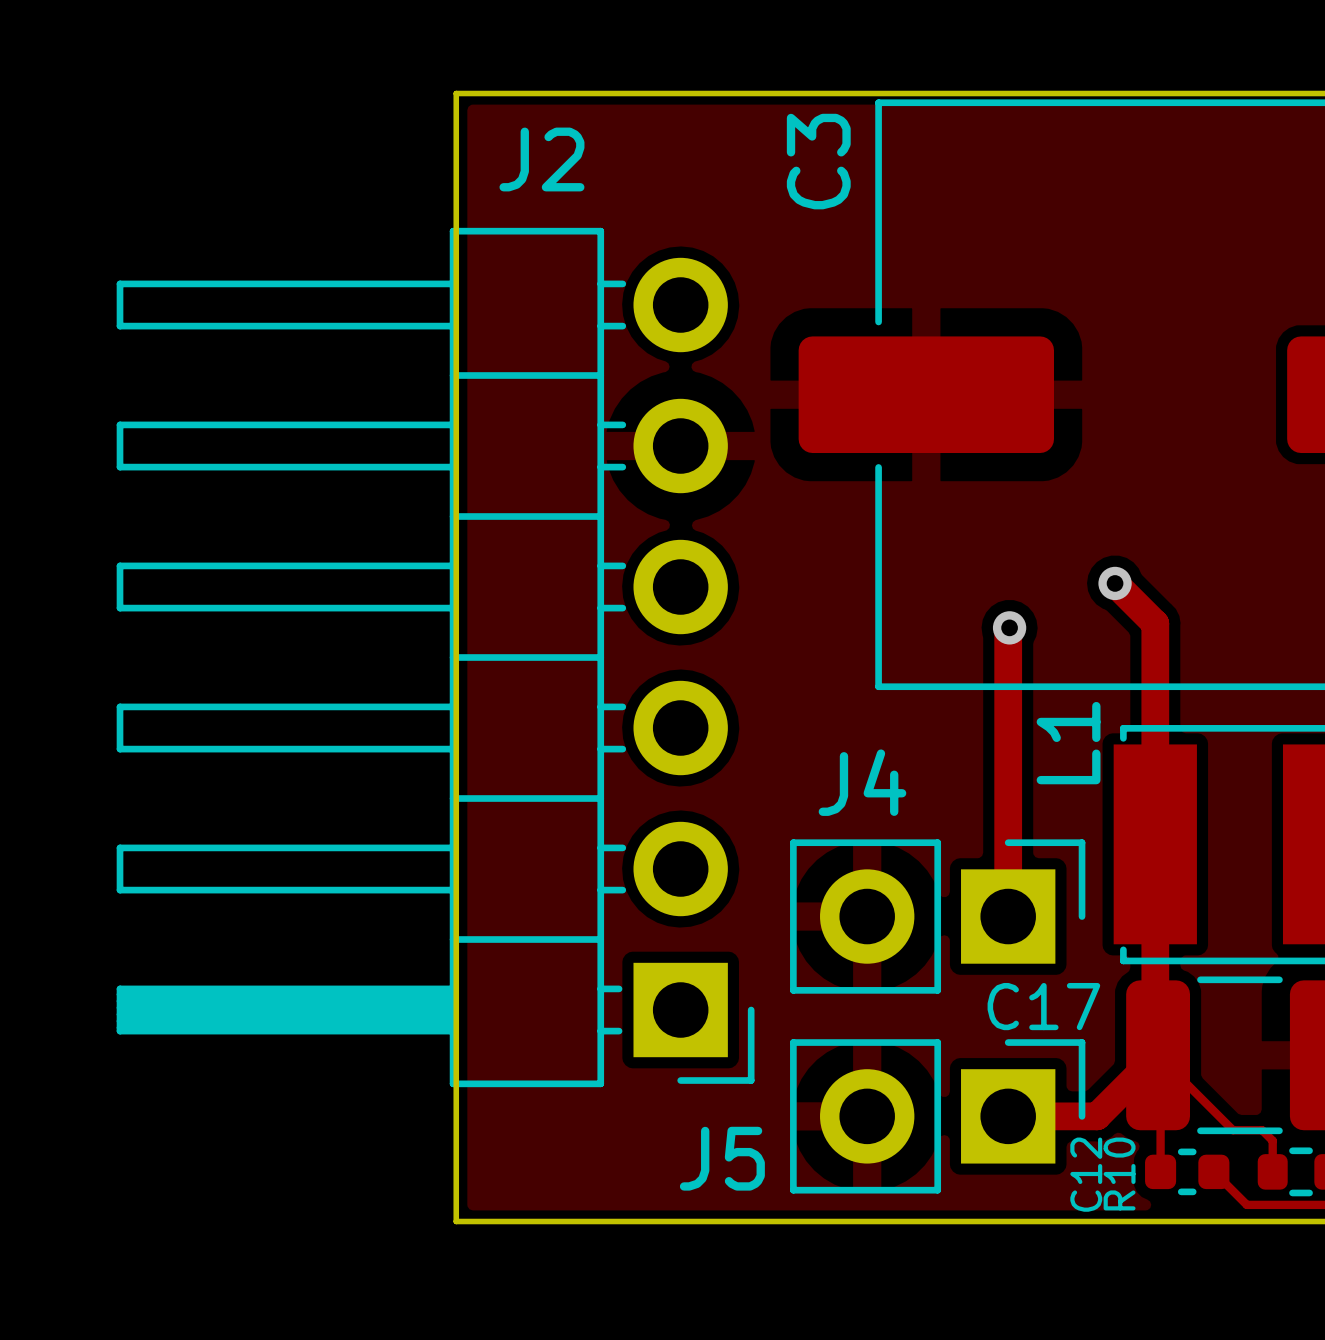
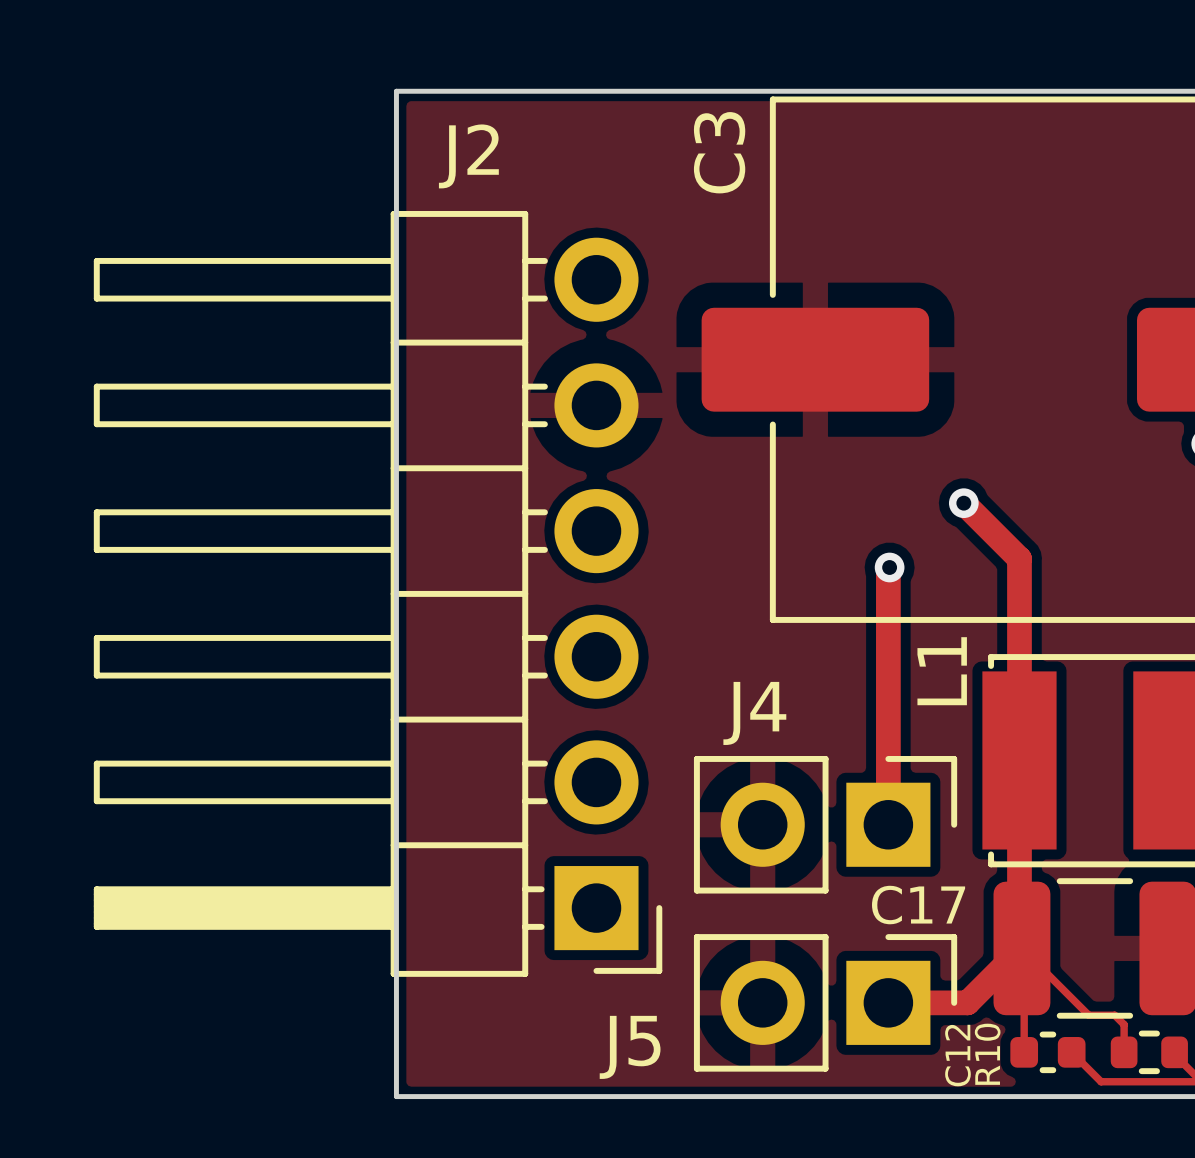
track: (1115, 583) (1155, 623) -> (963, 503) (1019, 558) (1019, 563)
via position: (1115, 583) -> (963, 503)

